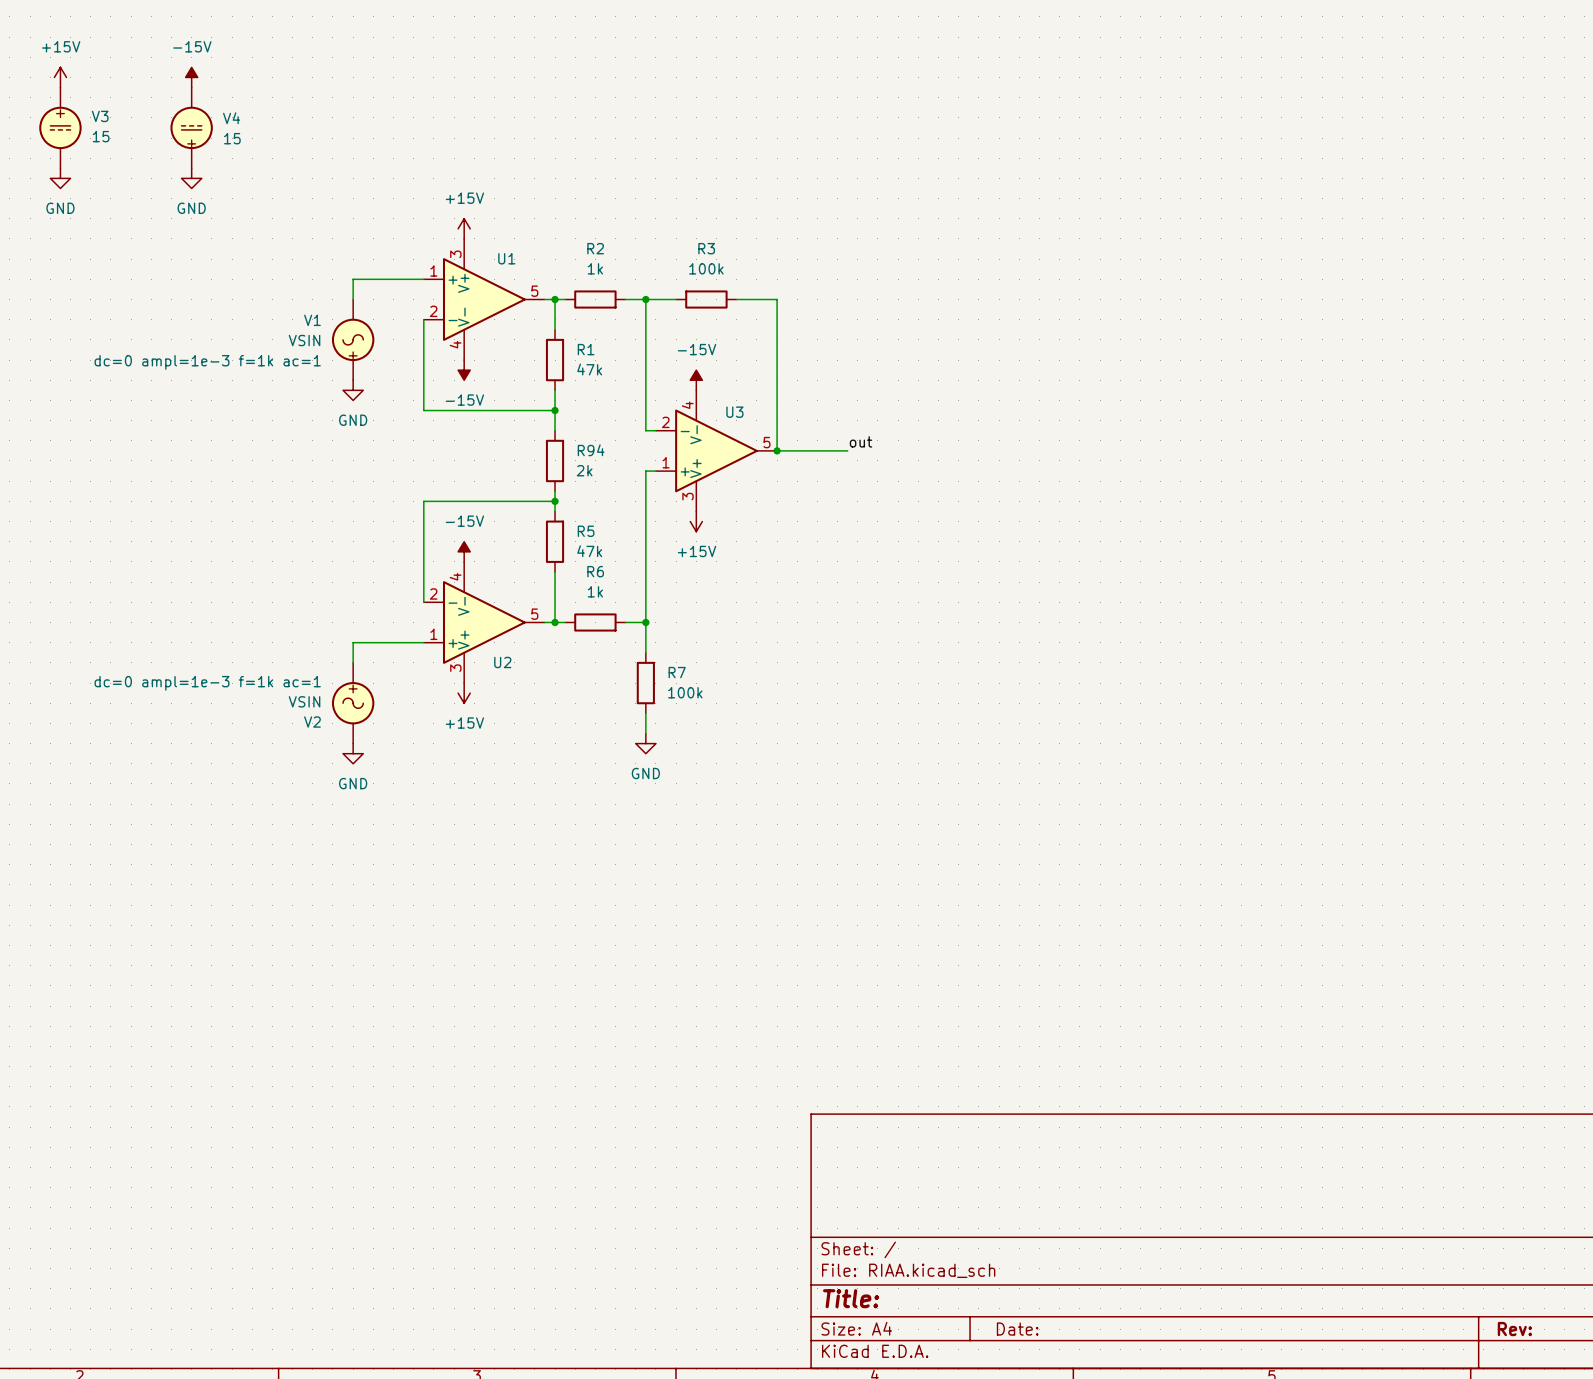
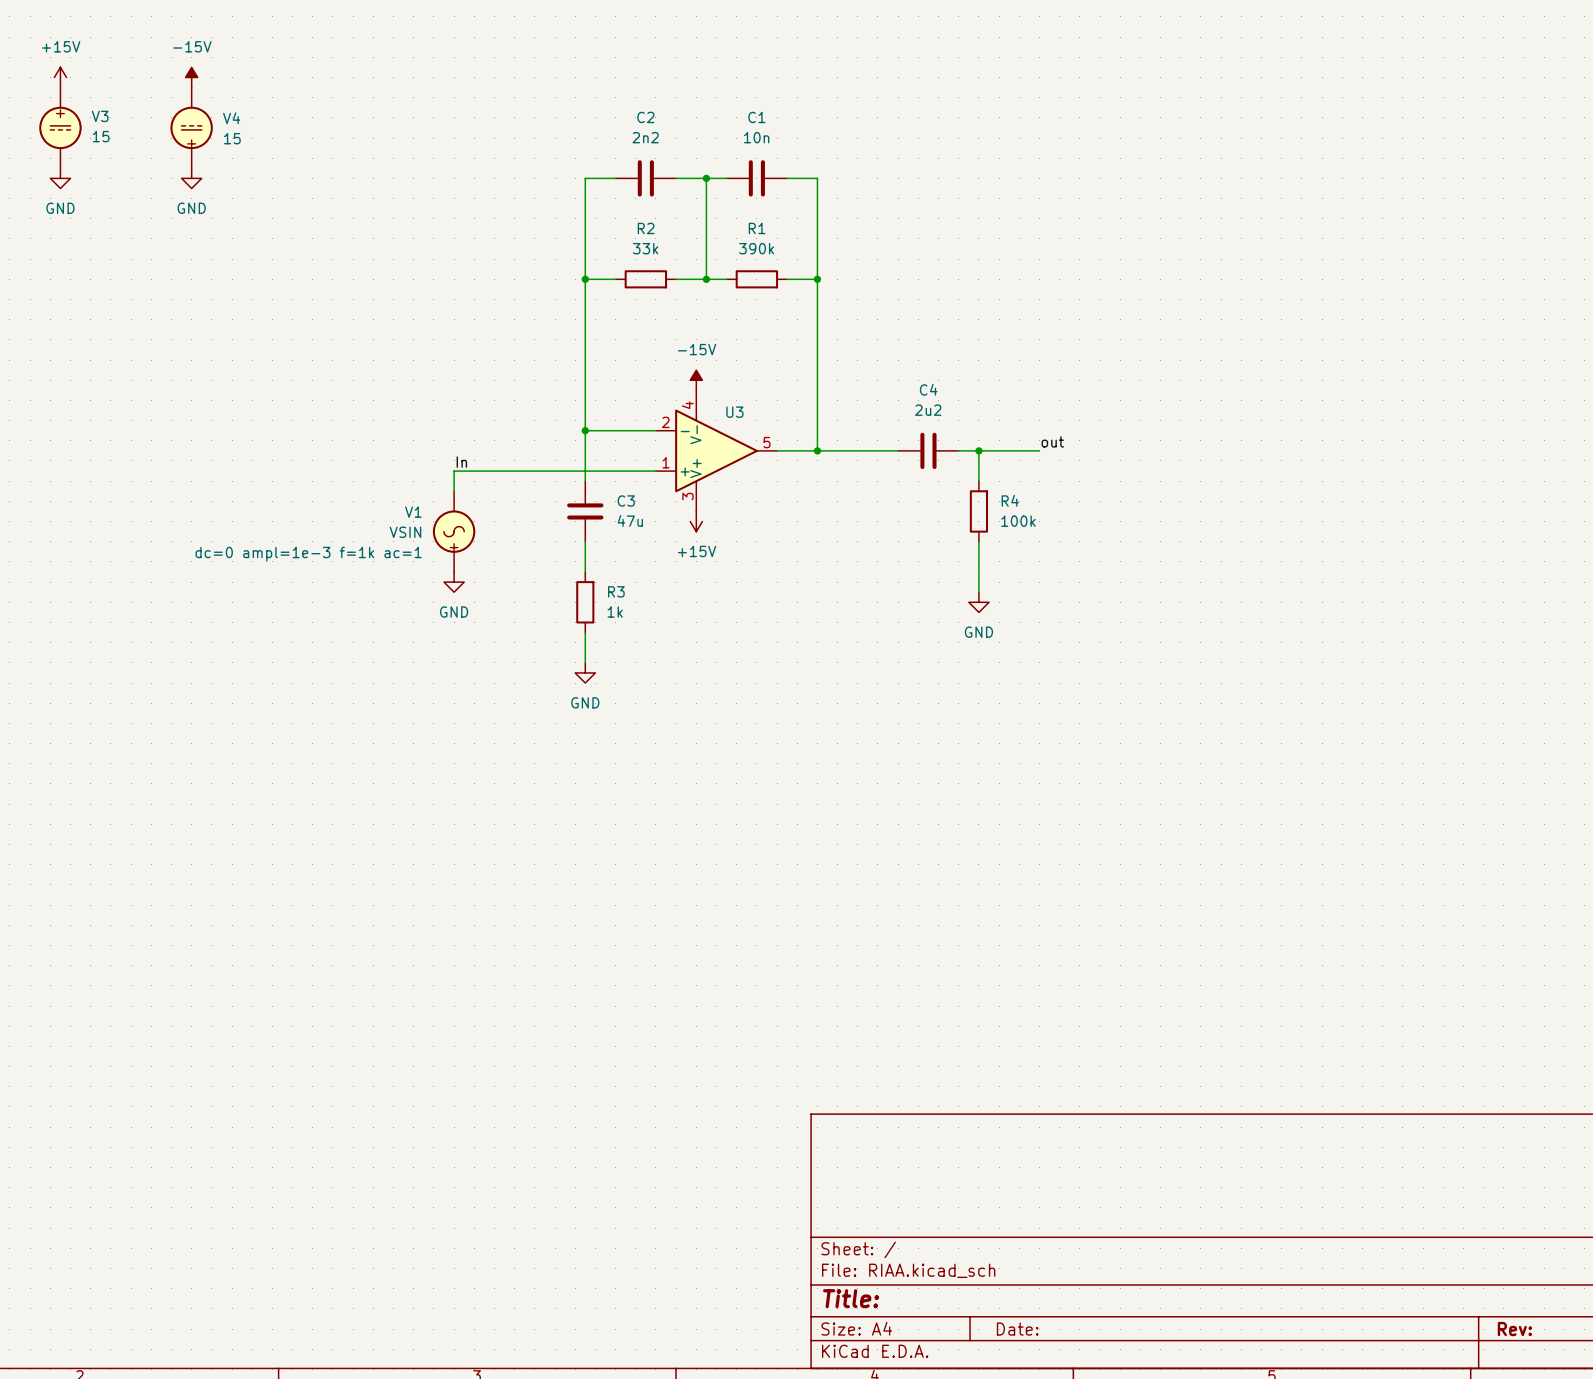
wire: none -> (615, 178) (585, 178) (585, 481)
C2: none -> 2n2 (645, 178)
wire: none -> (676, 178) (726, 178)
wire: none -> (706, 178) (706, 279)
junction: none -> (706, 178)
C1: none -> 10n (756, 178)
wire: none -> (787, 178) (817, 178) (817, 450)
power symbol: +15V (464, 228) -> none
R3 name position: R3 (706, 248) -> R3 (616, 591)
R2 value: 1k (595, 268) -> 33k (645, 248)
R3 value: 100k (706, 268) -> 1k (615, 612)
wire: (423, 279) (353, 279) (353, 299) -> none
wire: none -> (585, 279) (615, 279)
junction: none -> (585, 279)
junction: none -> (706, 279)
wire: none -> (787, 279) (817, 279)
junction: none -> (817, 279)
U1: (484, 299) -> none
wire: (544, 299) (565, 299) -> none
wire: (555, 299) (555, 329) -> none
junction: (555, 299) -> none
R2 position: (595, 299) -> (645, 279)
wire: (625, 299) (676, 299) -> (676, 279) (726, 279)
wire: (645, 299) (645, 430) -> (585, 430) (645, 430)
junction: (645, 299) -> none
R3 rotation: 0° (706, 299) -> 90° clockwise (585, 602)
R3 position: (706, 299) -> (585, 602)
wire: (736, 299) (777, 299) (777, 450) -> none
wire: (423, 319) (423, 410) (555, 410) -> none
V1 position: (353, 339) -> (454, 531)
R1 name position: R1 (586, 349) -> R1 (757, 228)
R1 rotation: 0° (555, 360) -> 90° clockwise (756, 279)
R1 position: (555, 360) -> (756, 279)
R1 value: 47k (589, 369) -> 390k (756, 248)
power symbol: -15V (464, 370) -> none
power symbol: GND (353, 390) -> none
wire: (555, 390) (555, 430) -> none
junction position: (555, 410) -> (585, 430)
label position: out (861, 441) -> out (1052, 441)
junction position: (777, 450) -> (817, 450)
wire: none -> (847, 450) (898, 450)
C4: none -> 2u2 (928, 450)
wire: none -> (958, 450) (1039, 450)
wire: none -> (978, 450) (978, 481)
junction: none -> (978, 450)
R94: 2k (555, 460) -> none
label: none -> In (461, 462)
wire: (645, 471) (645, 652) -> (645, 471) (454, 471) (454, 491)
wire: (555, 491) (555, 511) -> none
wire: (555, 501) (423, 501) (423, 602) -> none
junction: (555, 501) -> none
C3: none -> 47u (585, 511)
R4: none -> 100k (978, 511)
R5: 47k (555, 541) -> none
wire: none -> (585, 541) (585, 572)
wire: none -> (978, 541) (978, 592)
power symbol: -15V (464, 551) -> none
wire: (555, 572) (555, 622) -> none
power symbol: none -> GND (454, 582)
power symbol: none -> GND (978, 602)
U2: (484, 622) -> none
wire: (544, 622) (565, 622) -> none
junction: (555, 622) -> none
R6: 1k (595, 622) -> none
wire: (625, 622) (645, 622) -> none
junction: (645, 622) -> none
wire: none -> (585, 632) (585, 662)
wire: (423, 642) (353, 642) (353, 662) -> none
R7: 100k (645, 683) -> none
power symbol: +15V (464, 693) -> none
V2: VSIN (353, 703) -> none
wire: (645, 713) (645, 733) -> none
power symbol position: GND (645, 743) -> GND (585, 672)
power symbol: GND (353, 753) -> none

